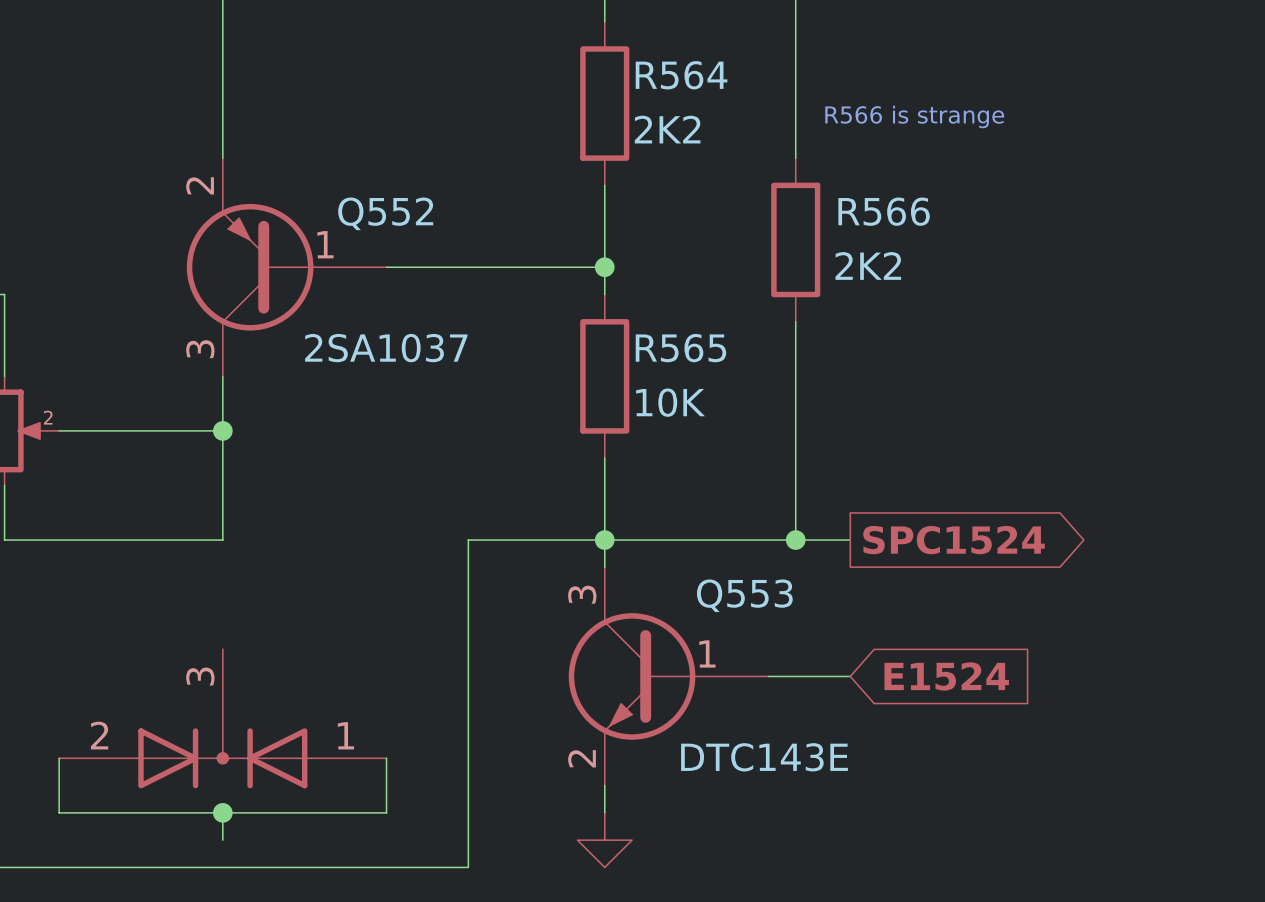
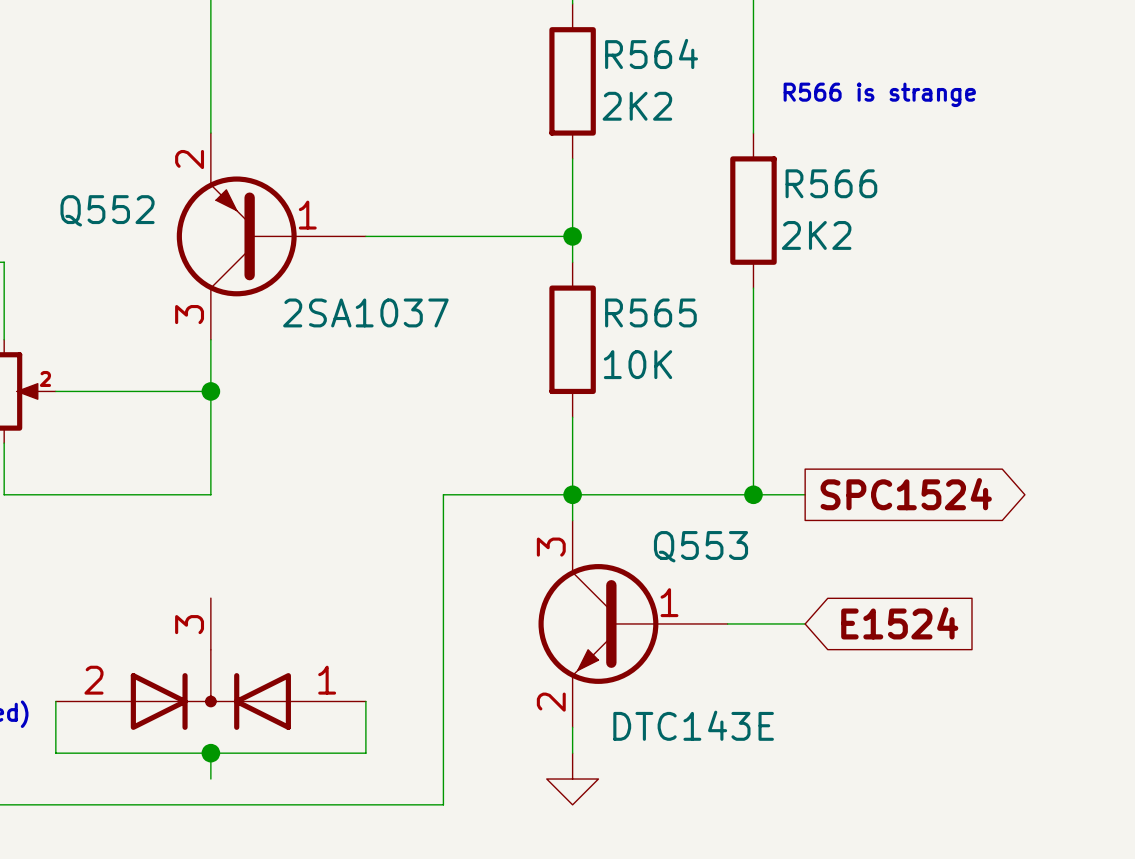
Q552 name position: Q552 (385, 213) -> Q552 (107, 210)
Q553 value position: DTC143E (764, 757) -> DTC143E (693, 725)

